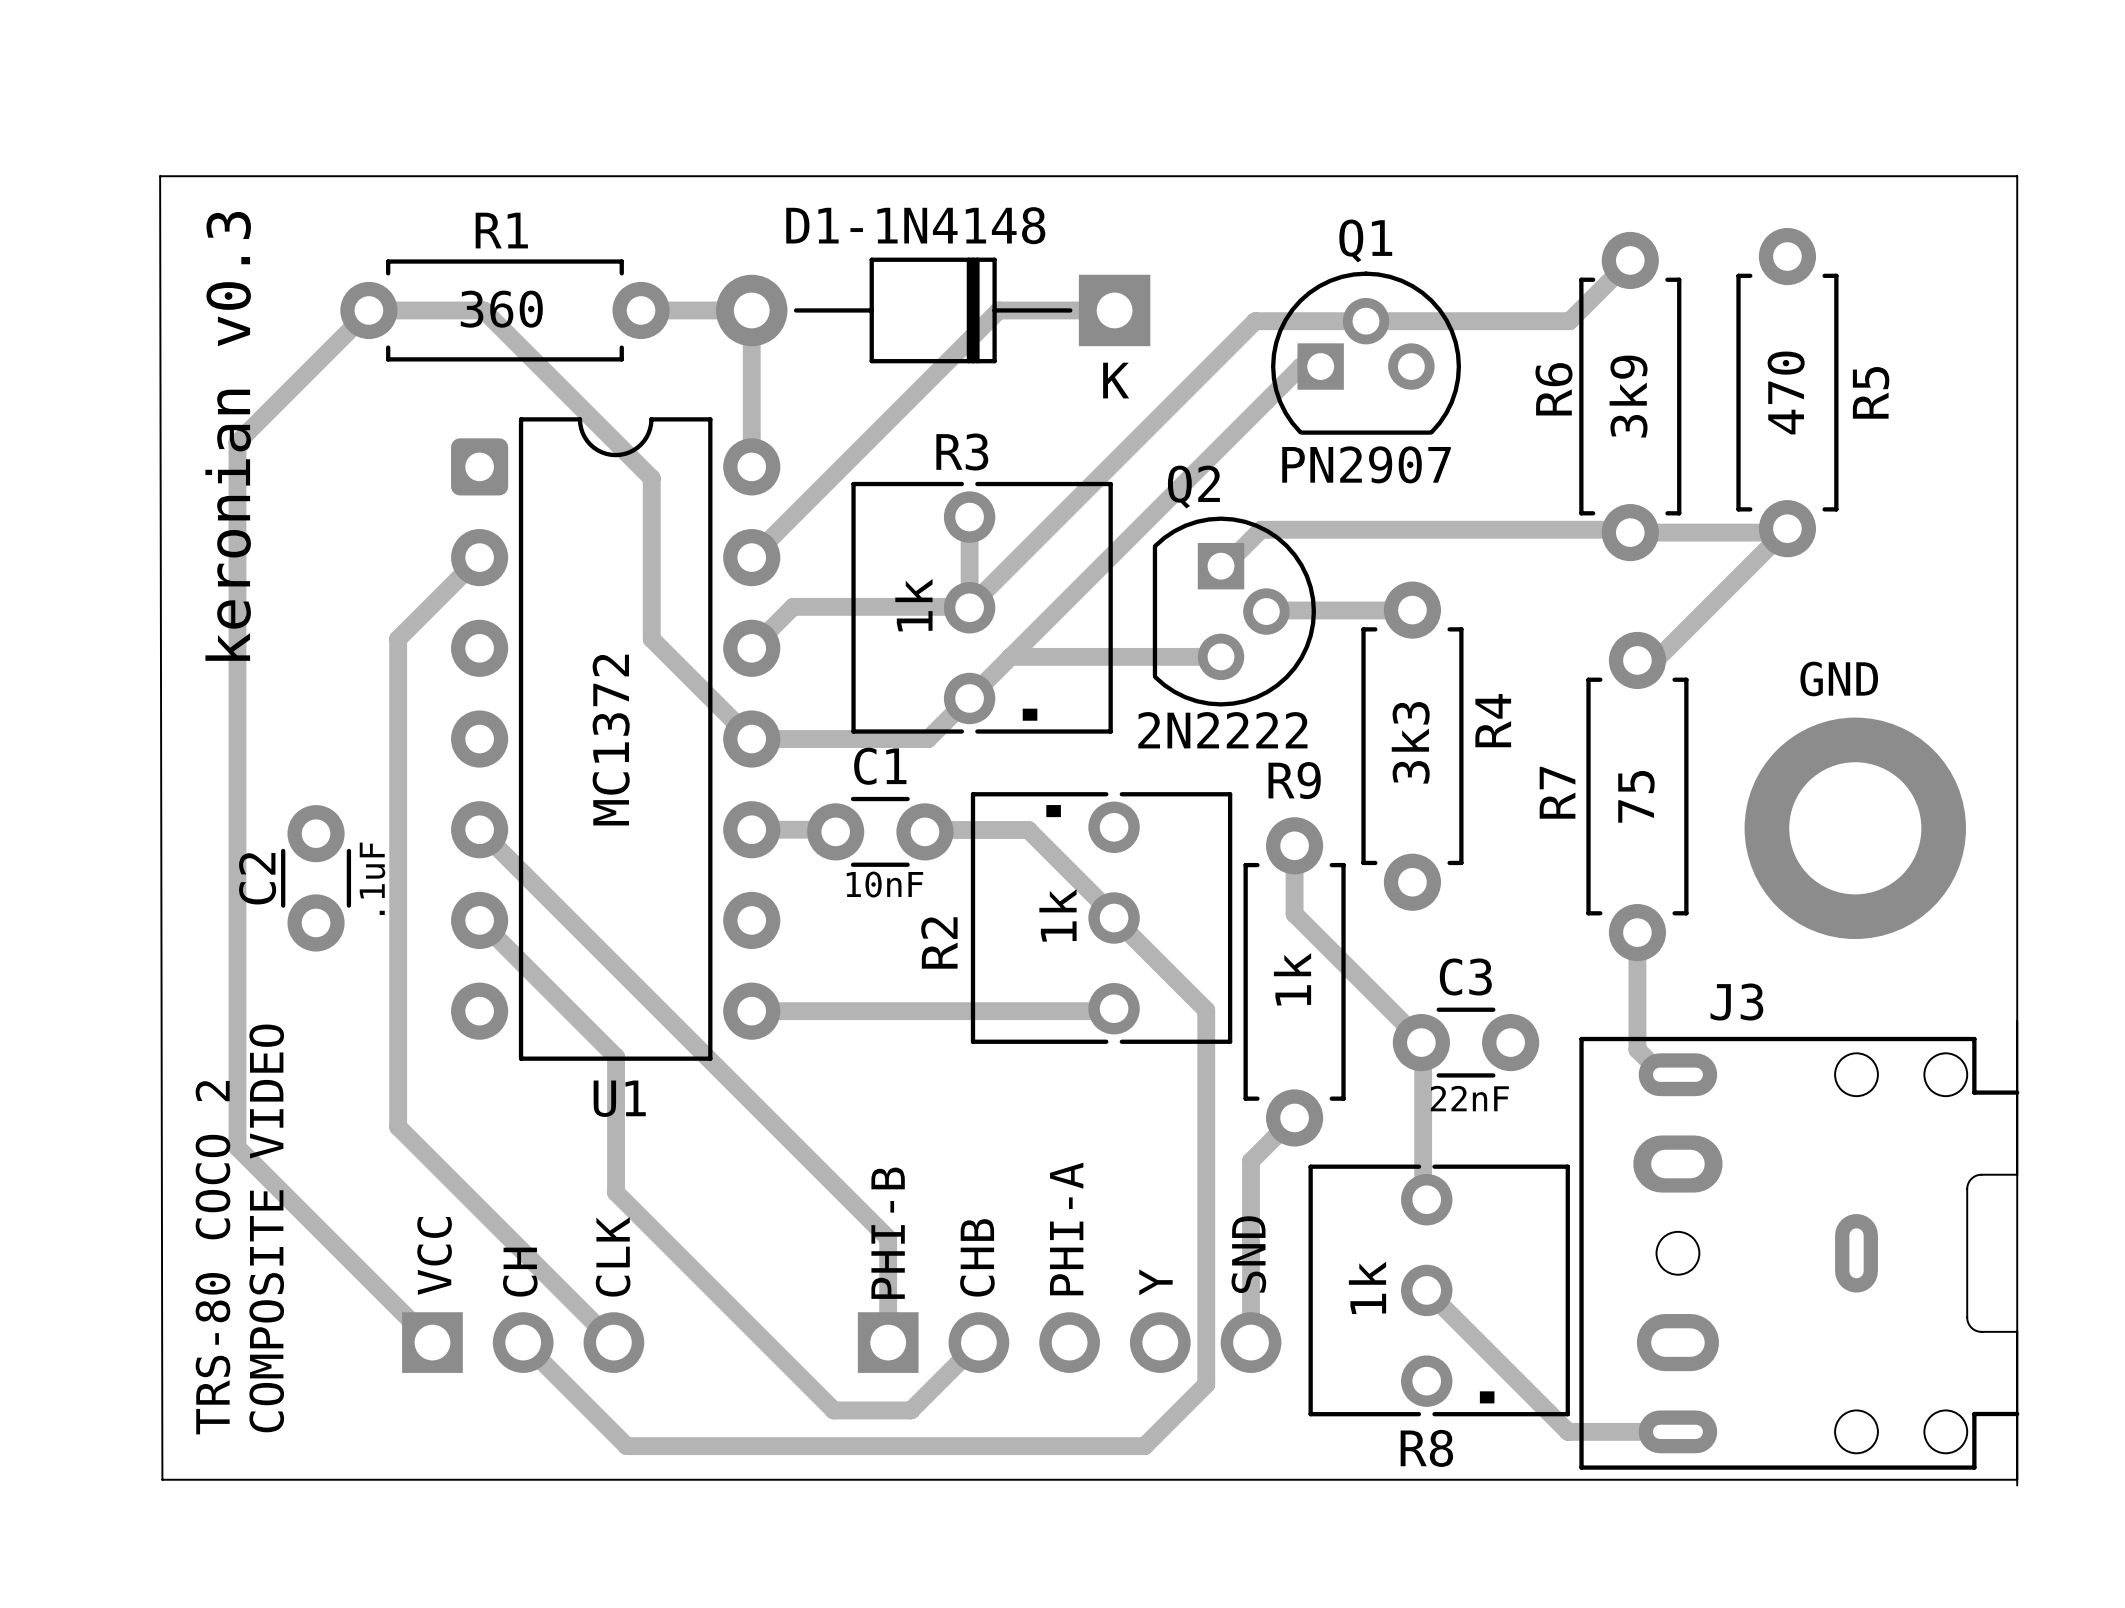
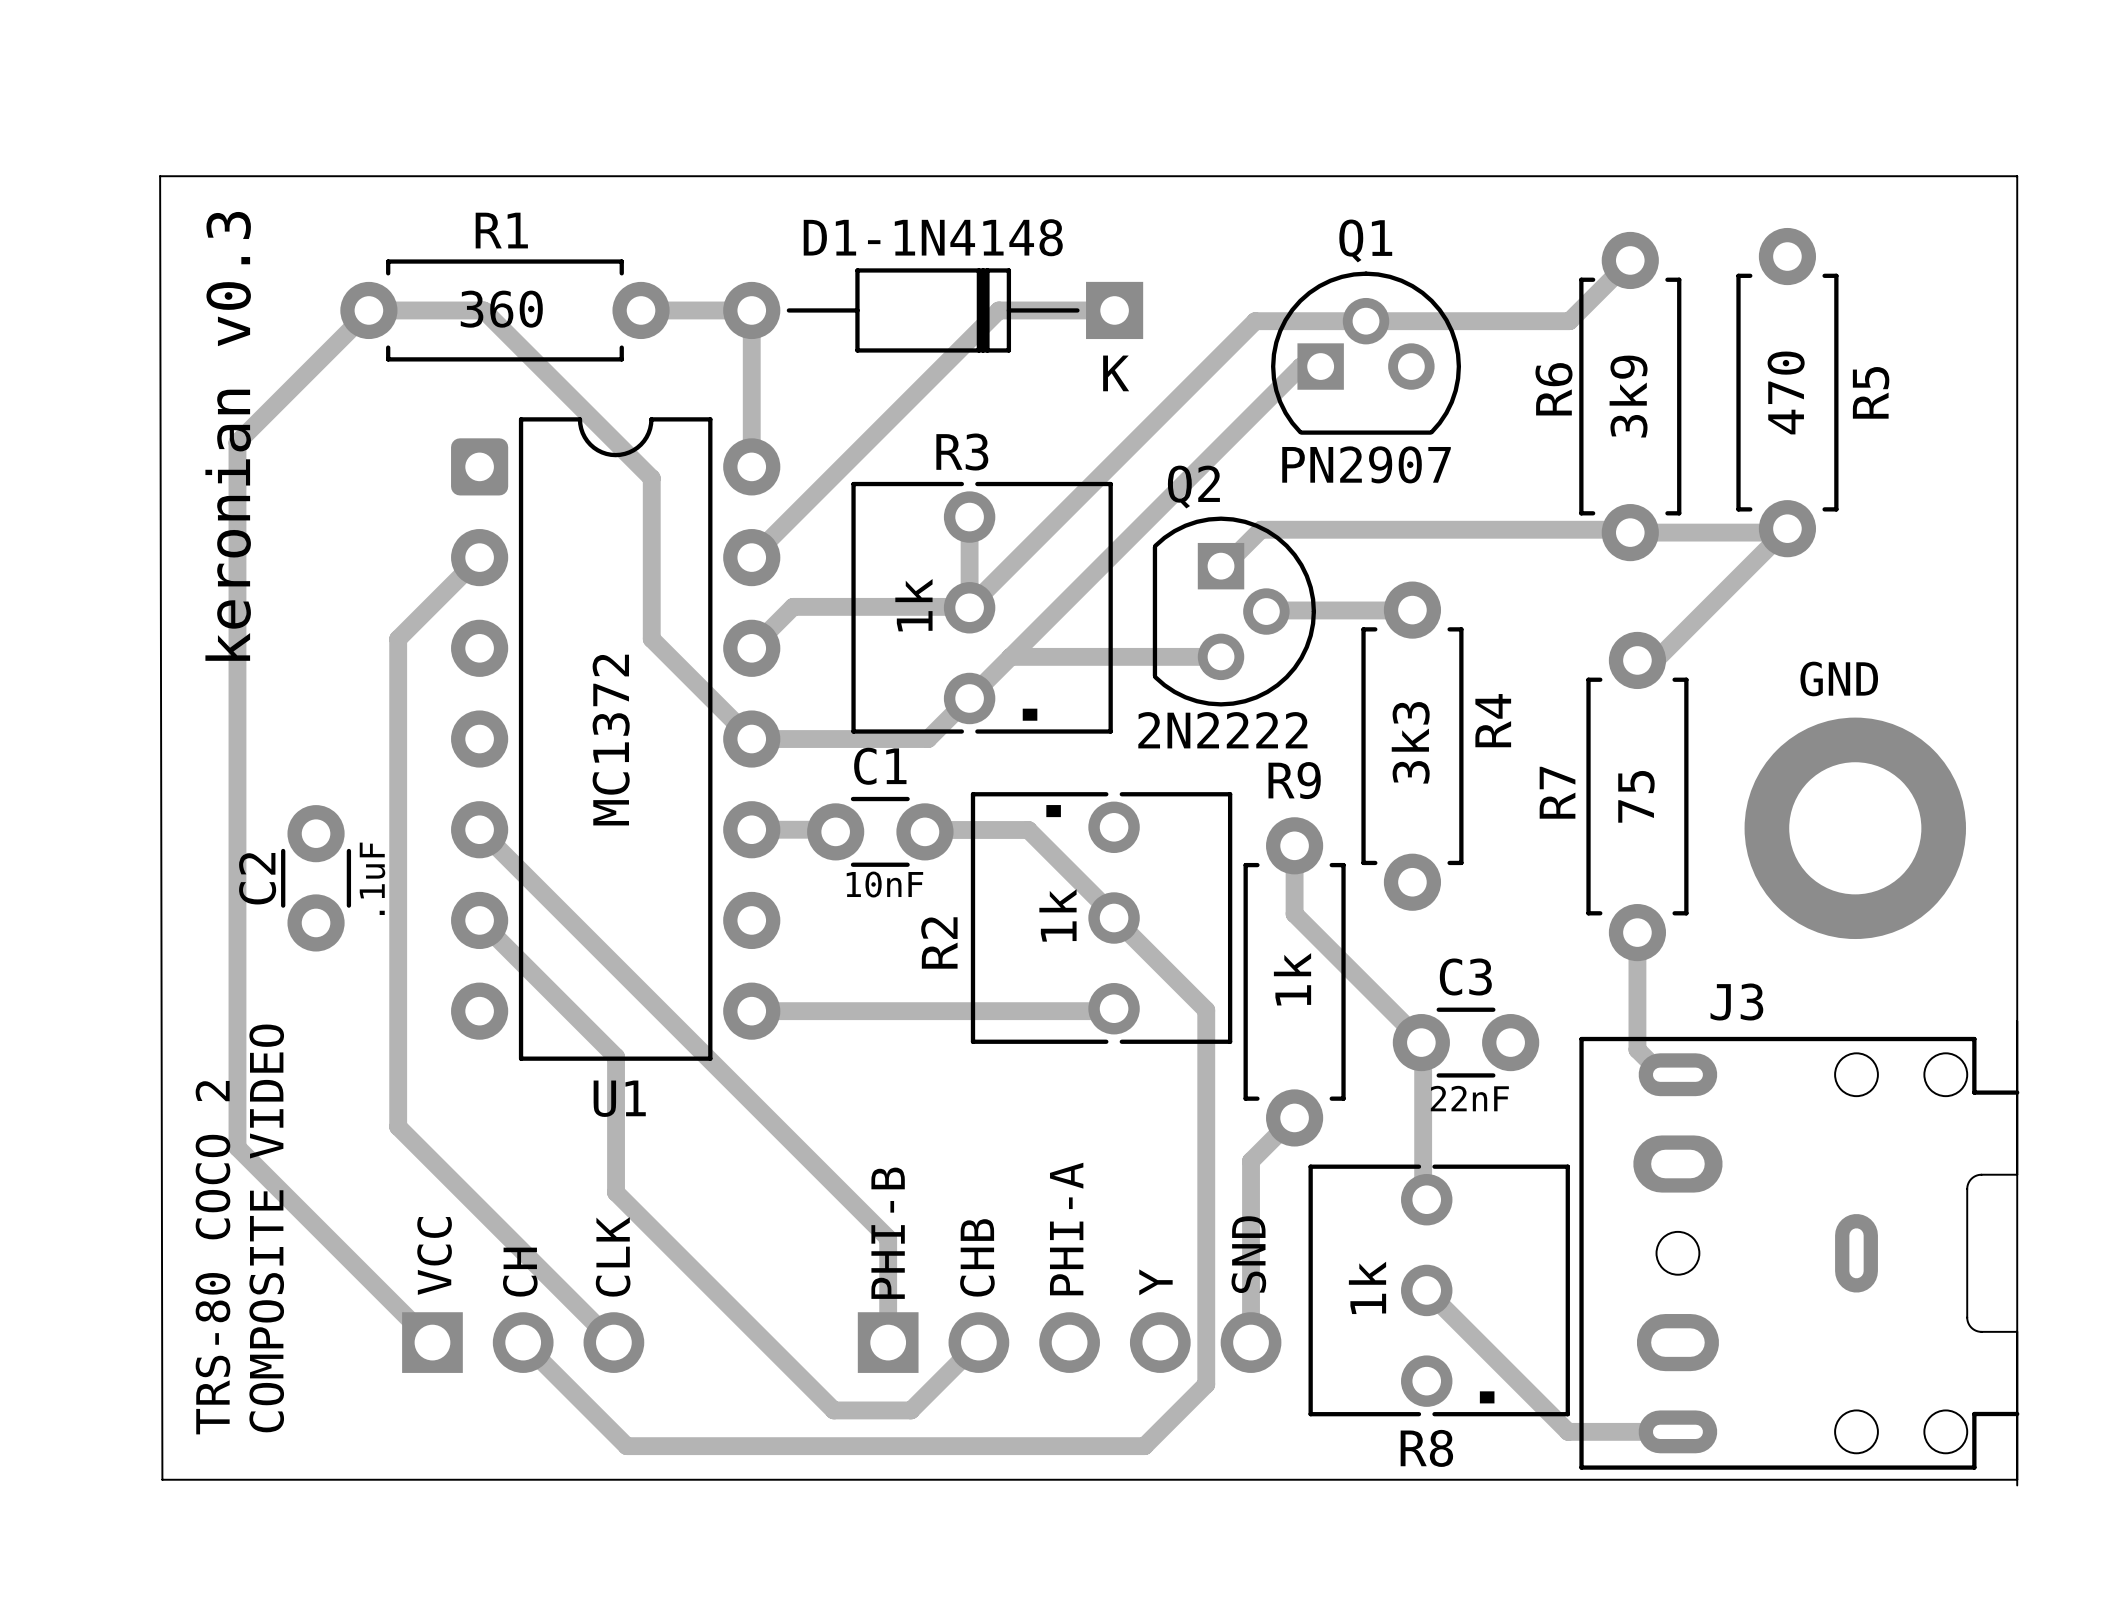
D1-1N4148 footprint: [716, 257, 1151, 364] -> [723, 268, 1144, 353]

